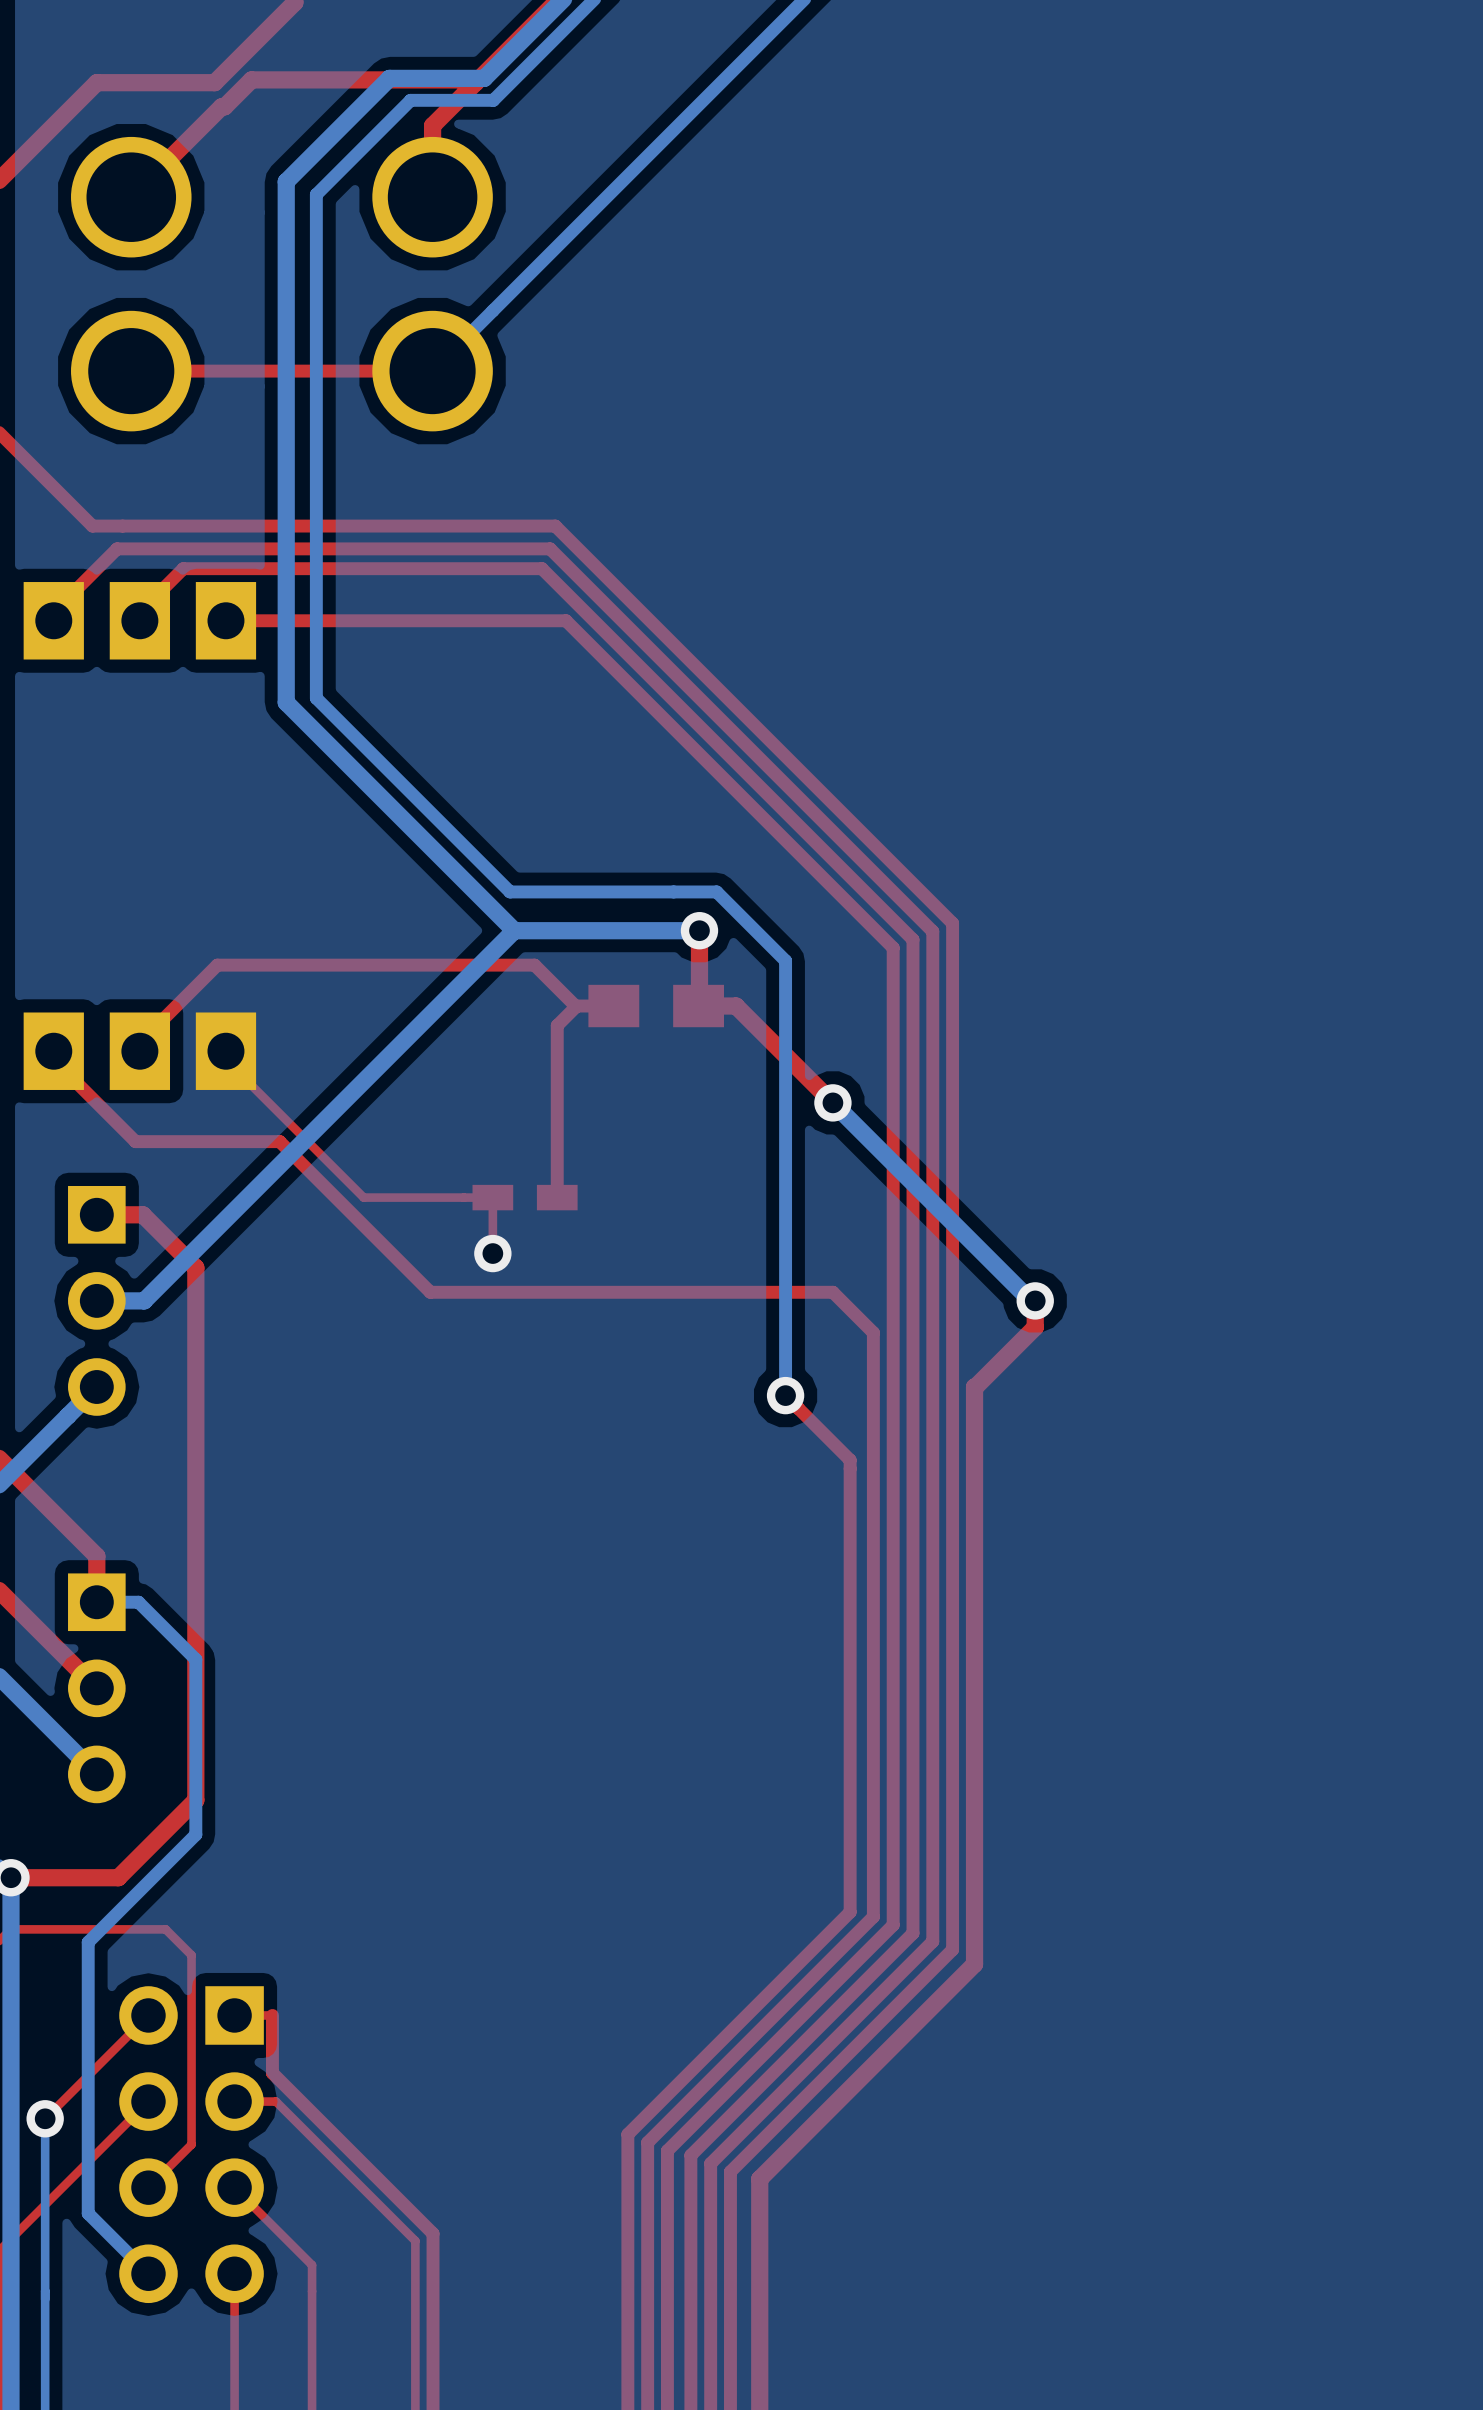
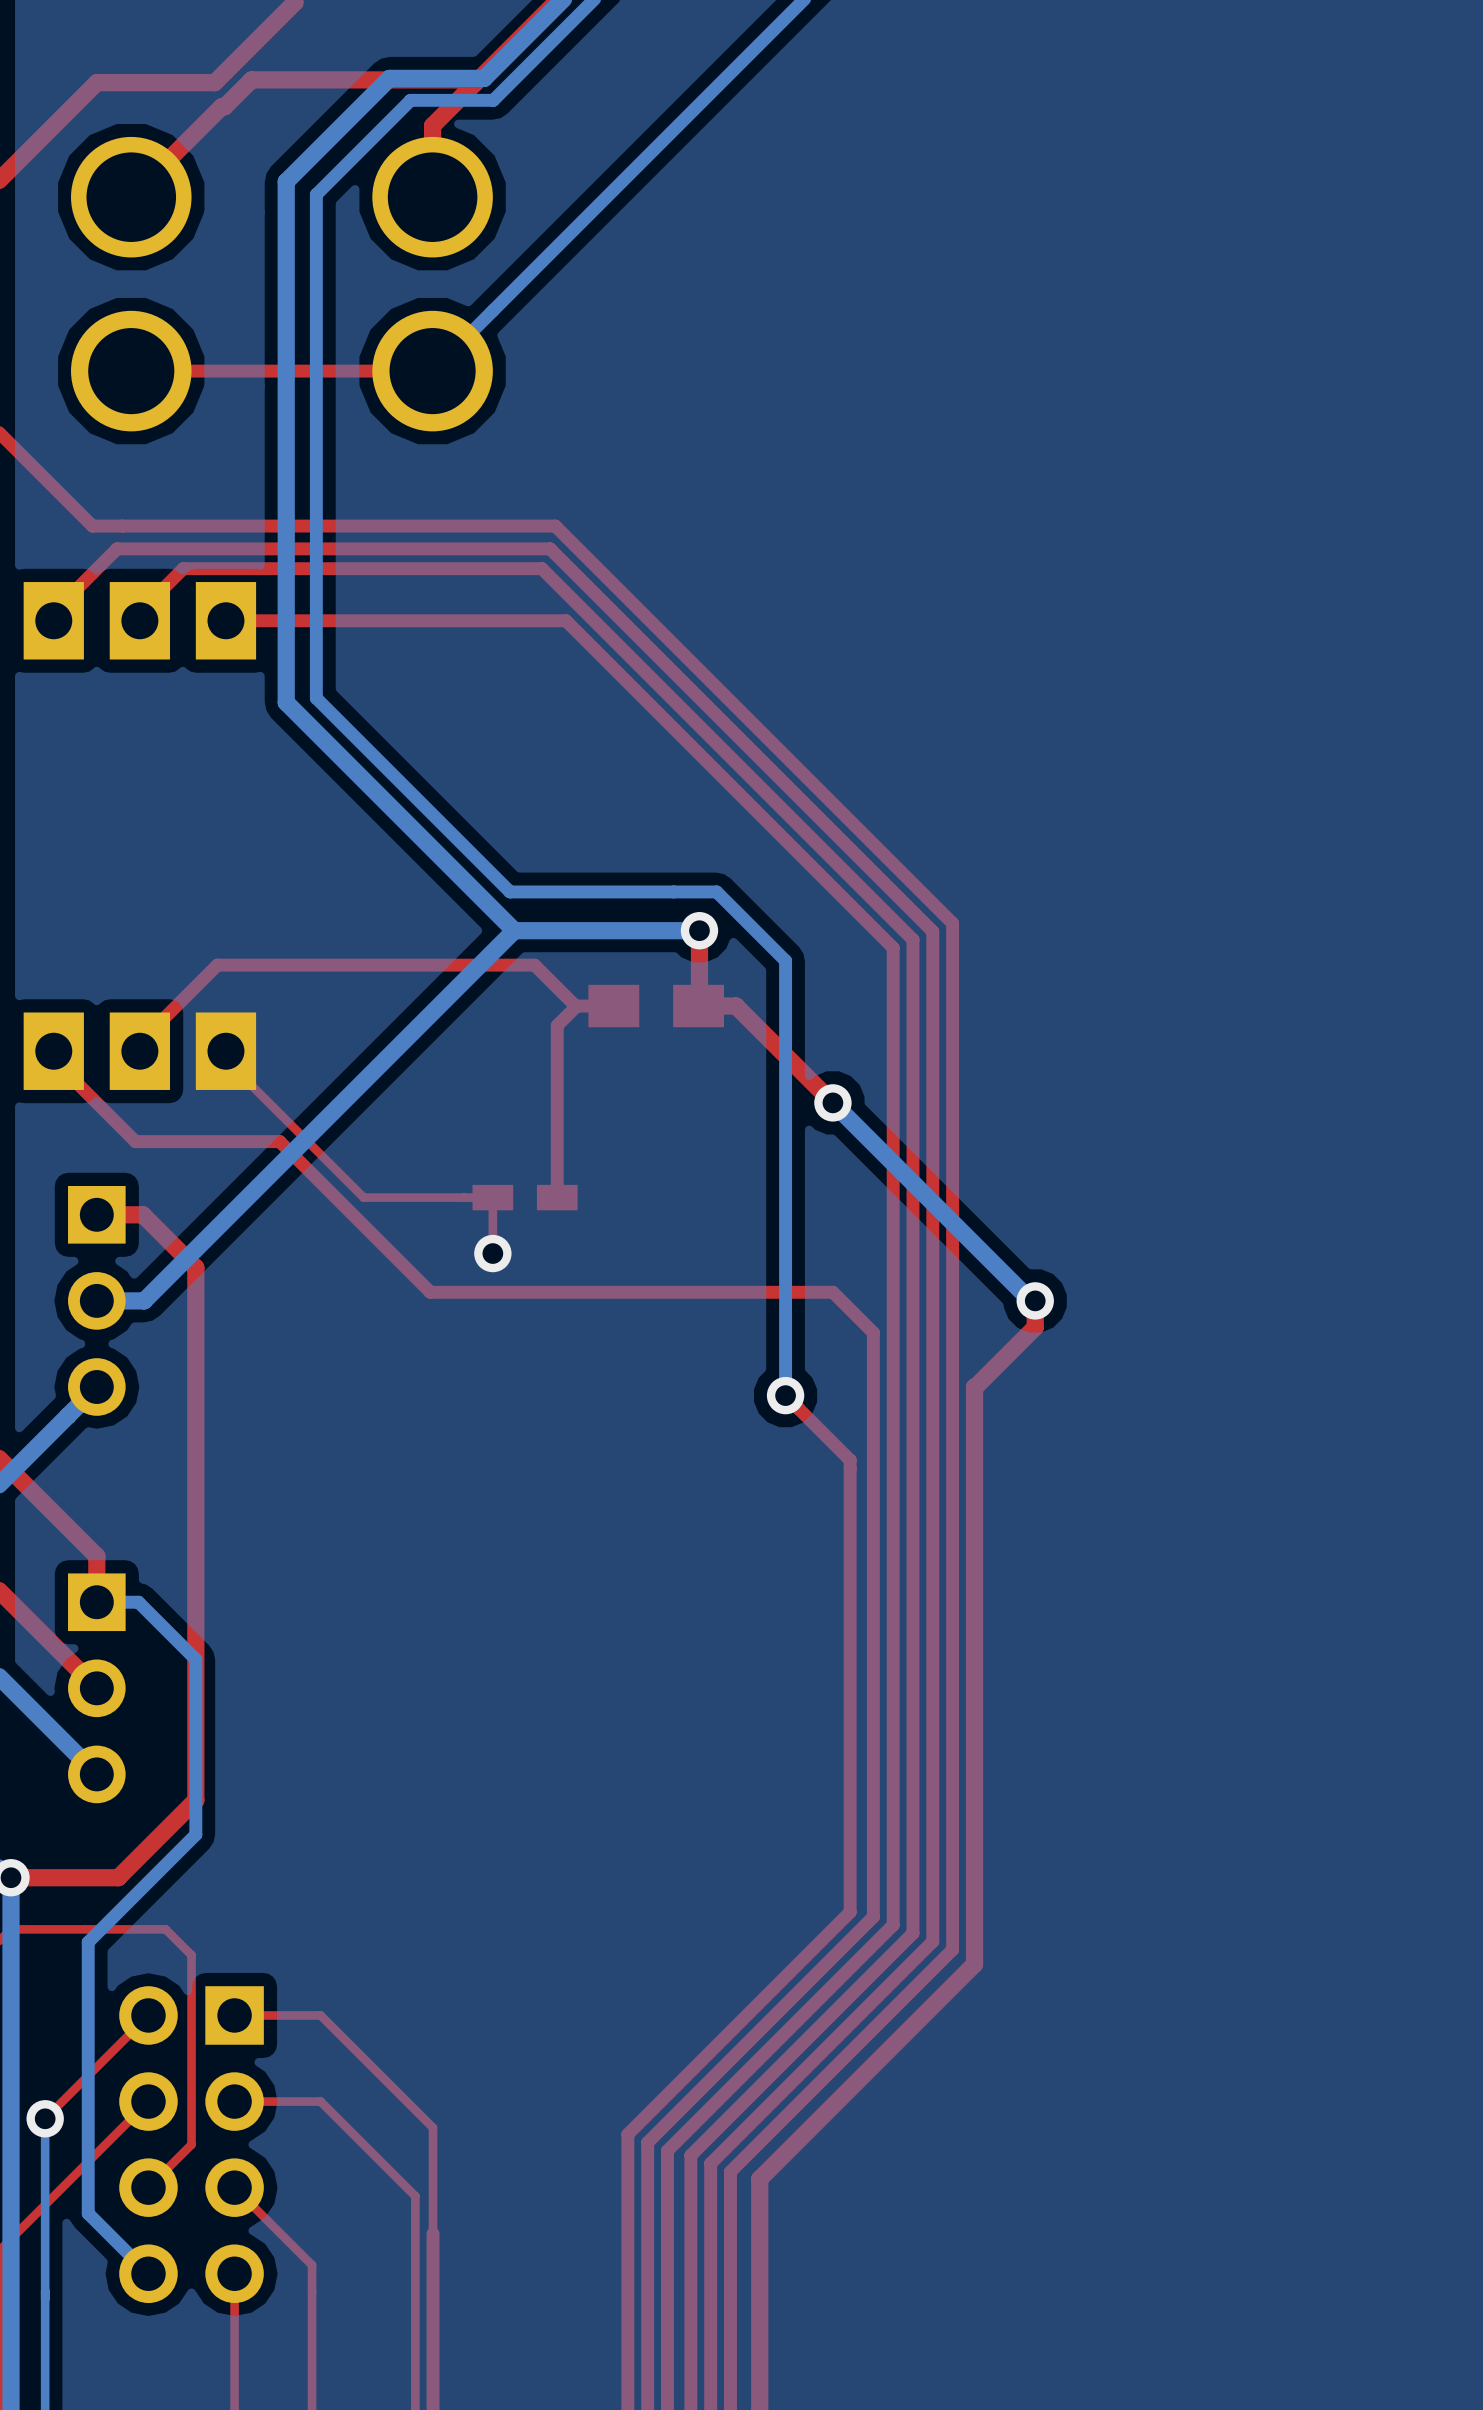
top track: (272, 2015) (272, 2073) (433, 2233) -> (272, 2015) (320, 2015) (433, 2127) (433, 2233)
top track: (275, 2101) (415, 2240) -> (275, 2101) (320, 2101) (415, 2196) (415, 2240)

